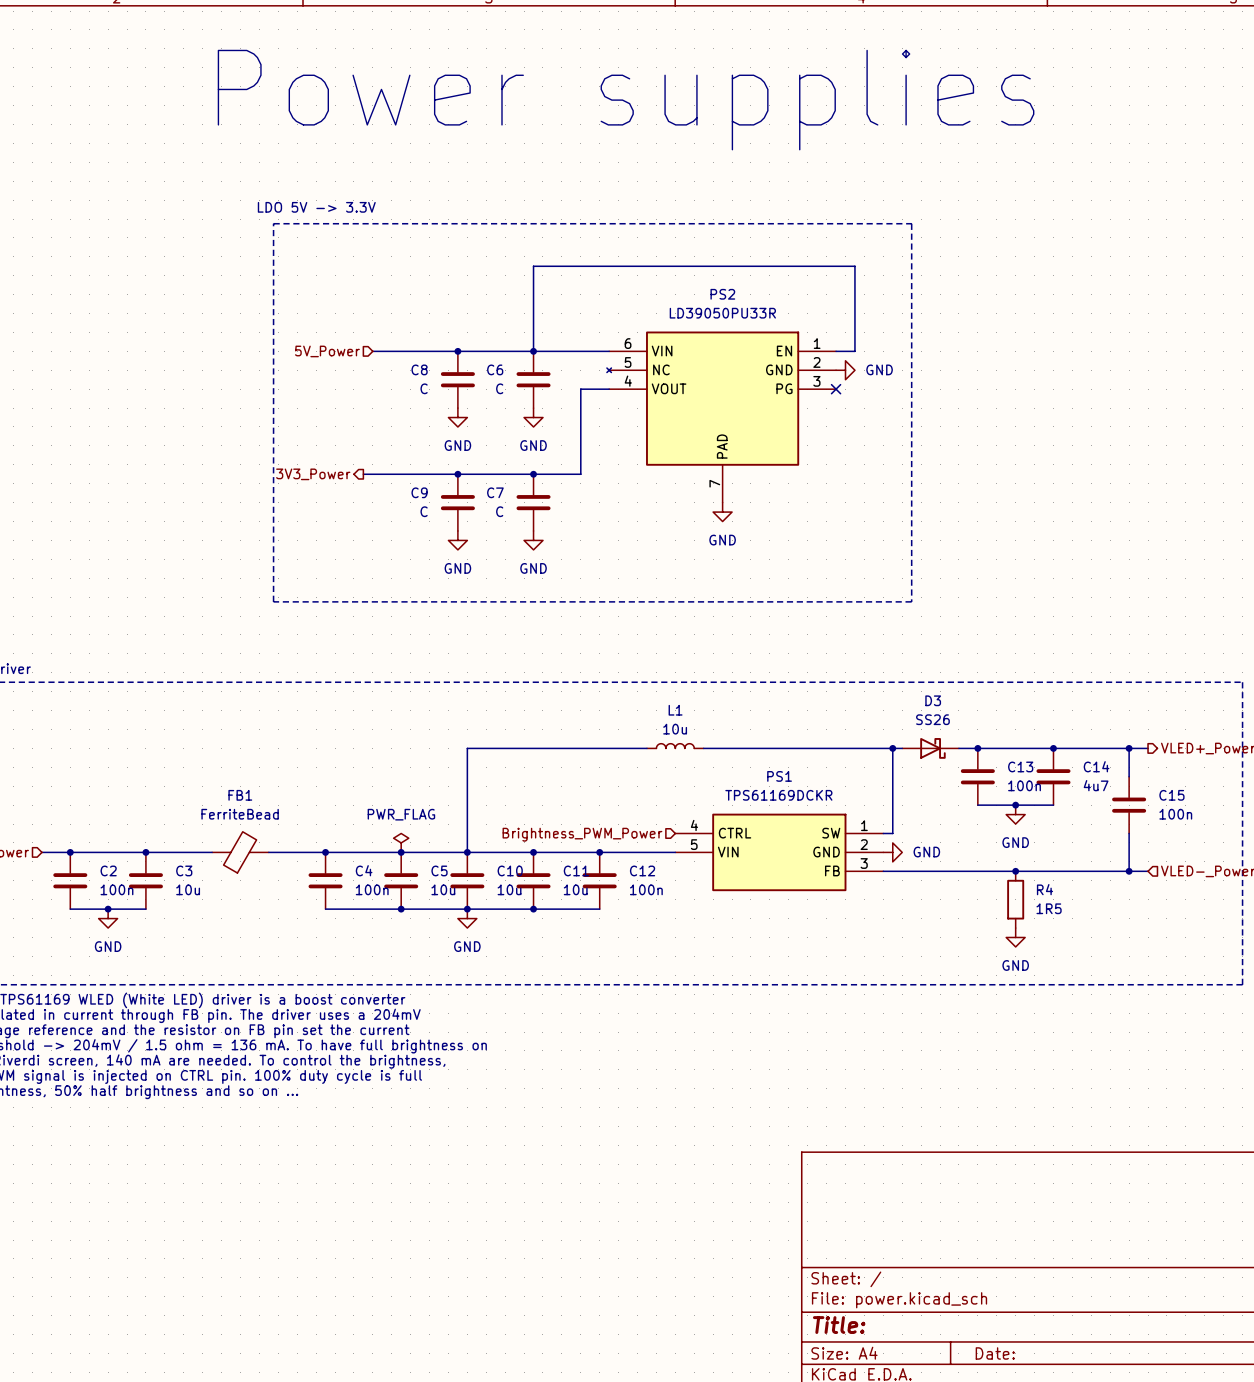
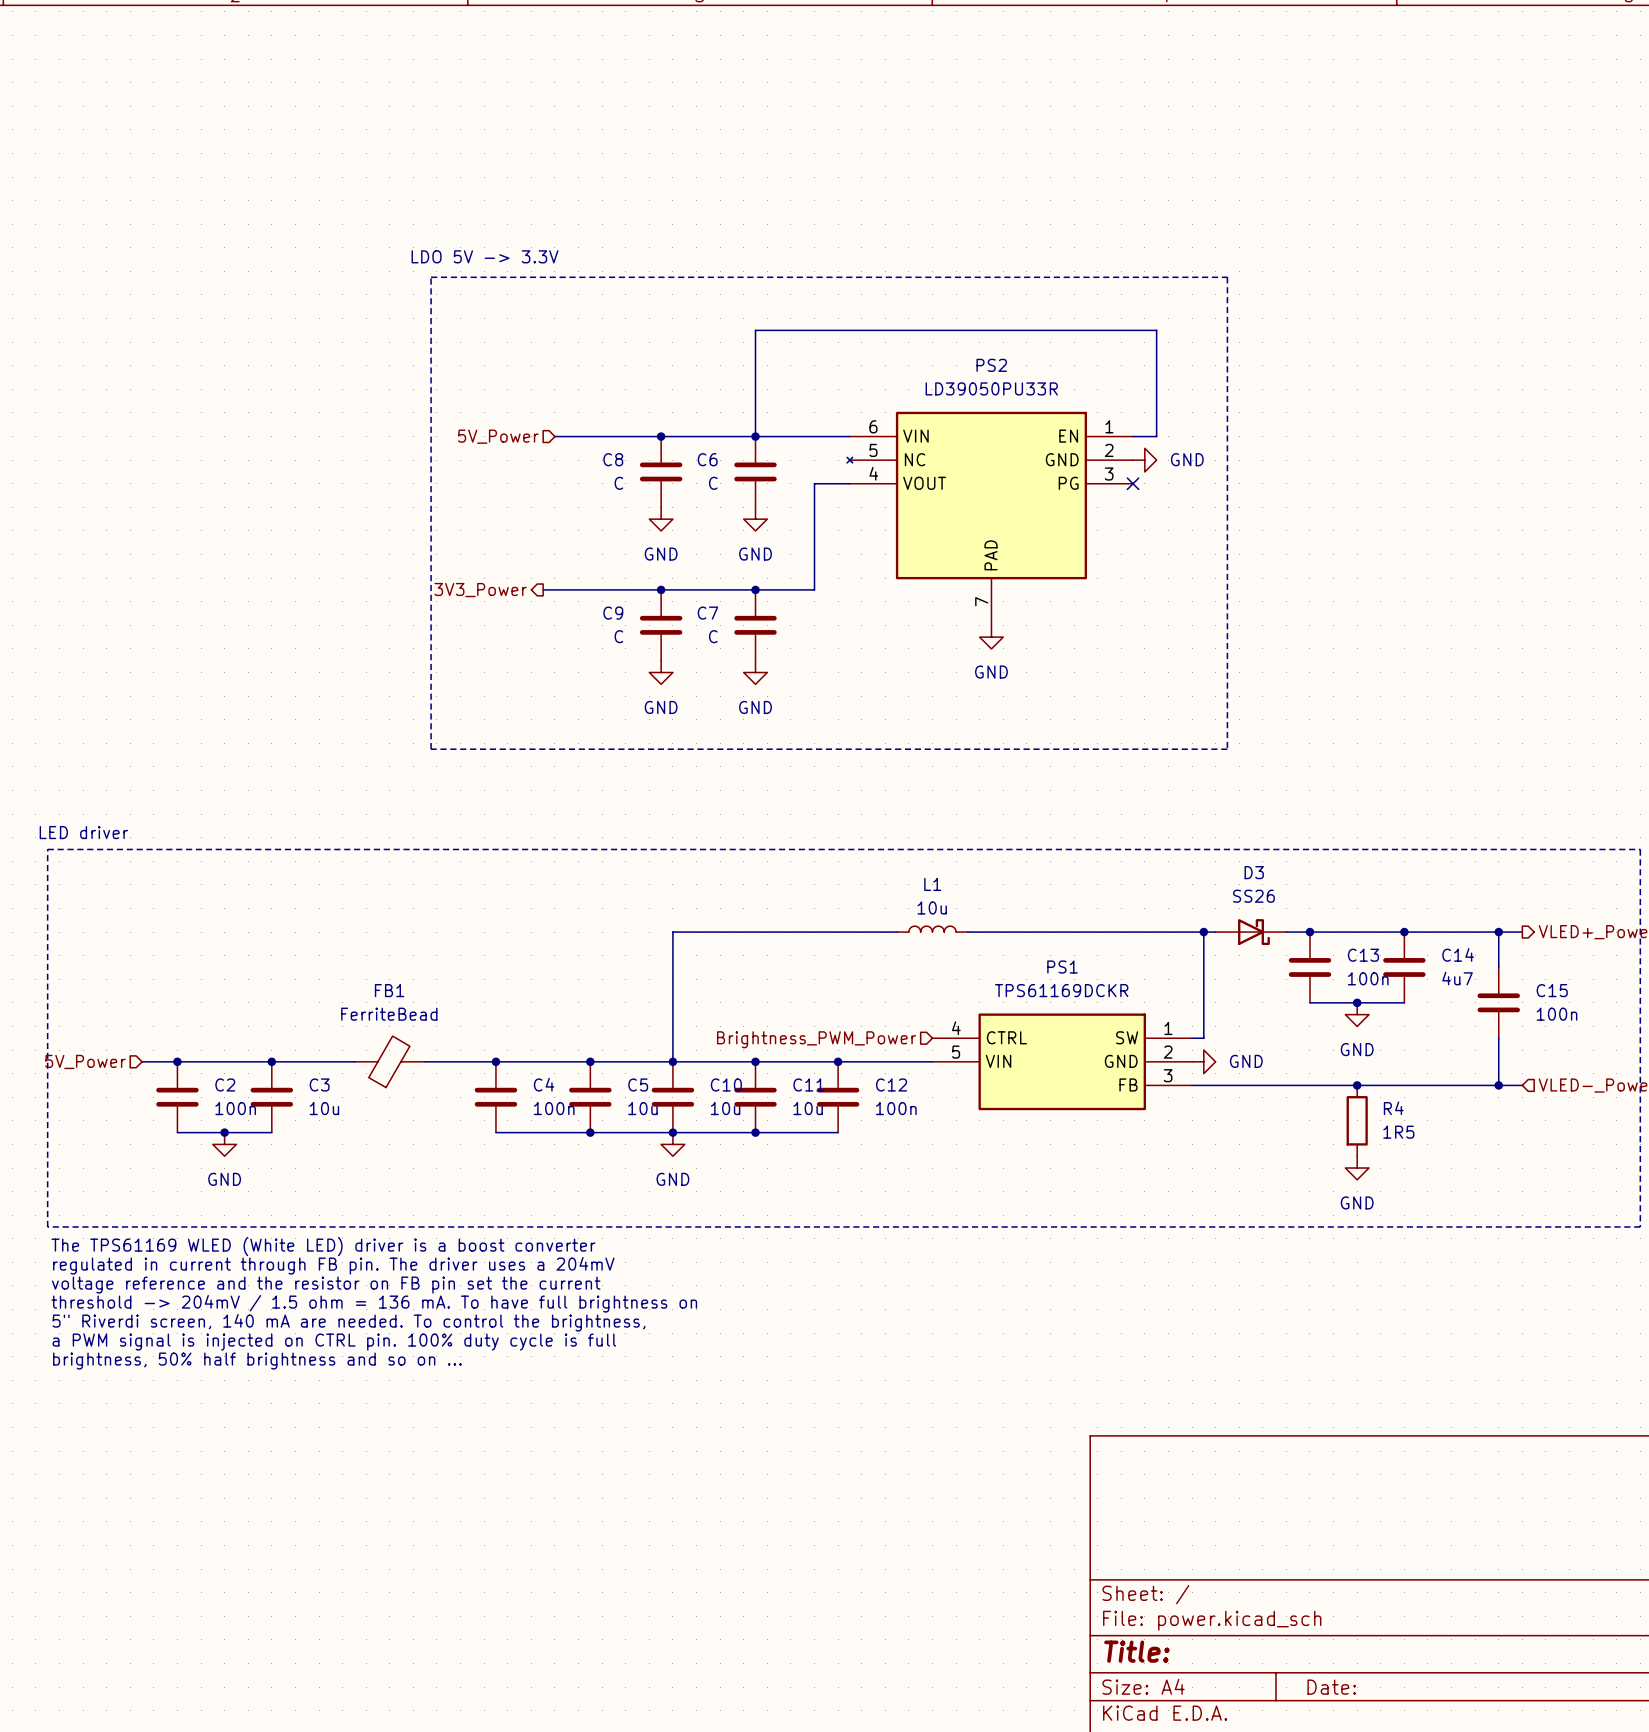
text: Power supplies (626, 100) -> none
power symbol: PWR_FLAG (401, 842) -> none

